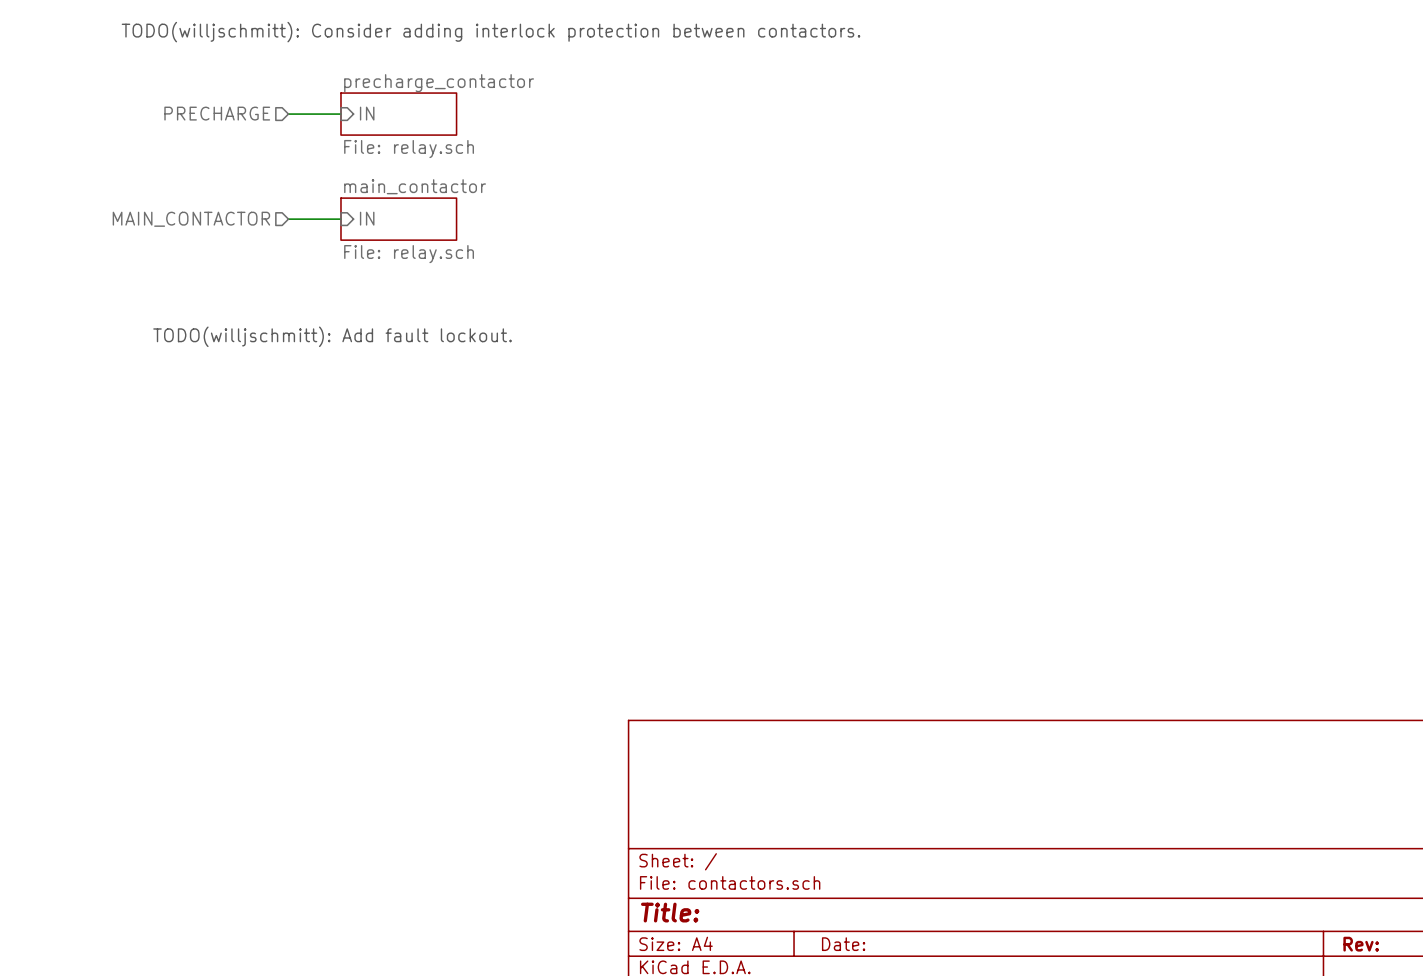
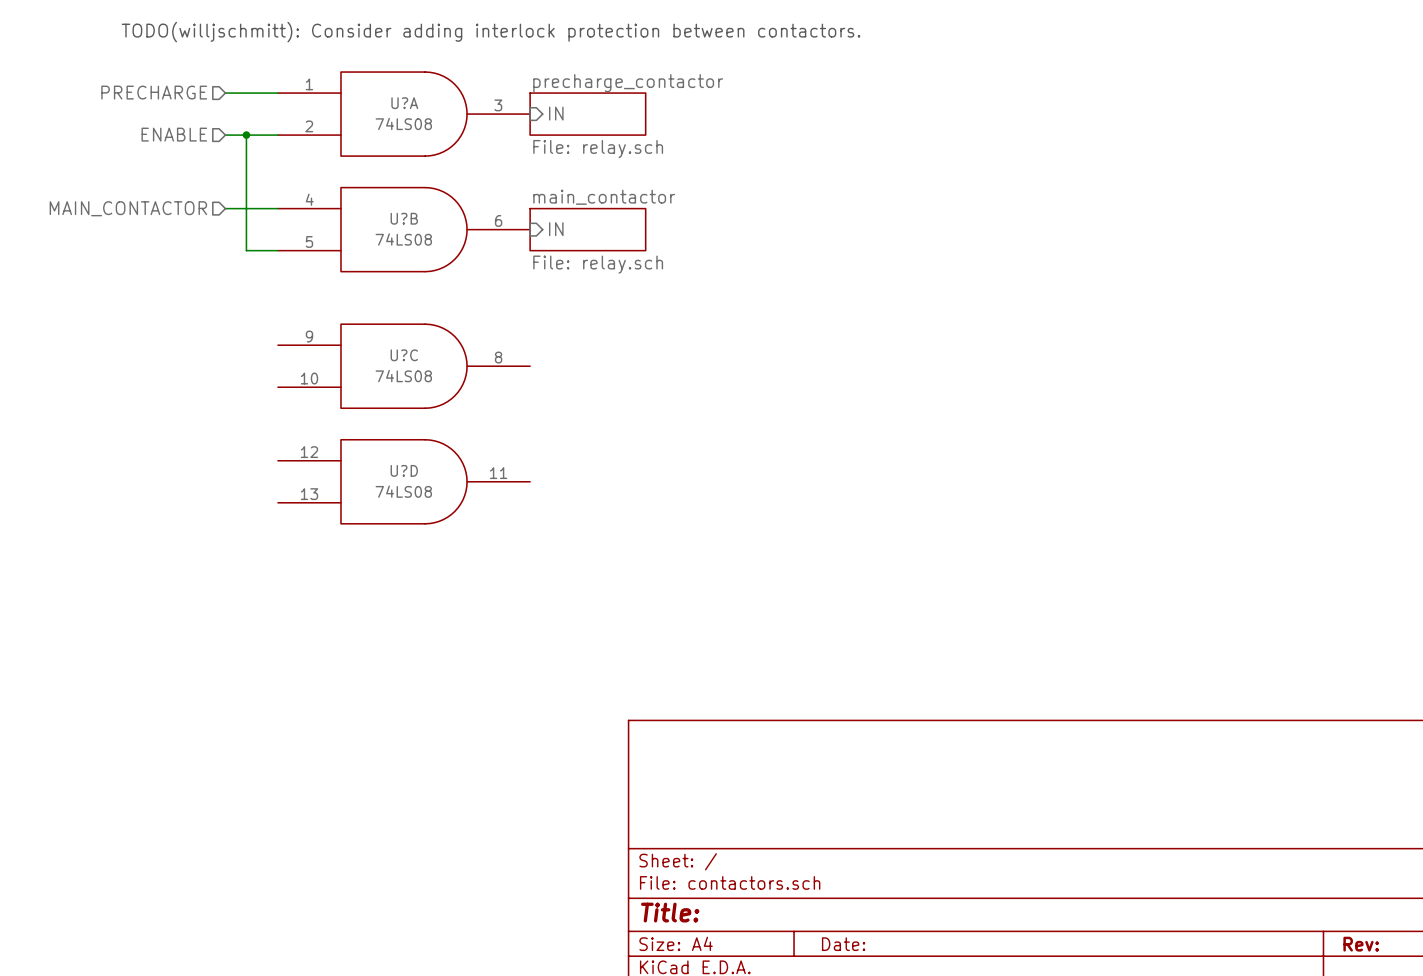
hierarchical label position: PRECHARGE (217, 113) -> PRECHARGE (154, 92)
sheet pin: IN (367, 113) -> none
sheet pin: none -> IN (556, 113)
wire: (288, 114) (340, 114) -> (225, 93) (277, 93)
sheet precharge_contactor position: (398, 114) -> (587, 114)
U?A: none -> 74LS08 (404, 114)
hierarchical label: none -> ENABLE (174, 134)
wire: none -> (225, 135) (277, 135)
wire: none -> (246, 135) (246, 250) (277, 250)
junction: none -> (246, 135)
sheet pin: IN (367, 218) -> none
hierarchical label position: MAIN_CONTACTOR (191, 219) -> MAIN_CONTACTOR (128, 208)
wire: (288, 219) (340, 219) -> (225, 208) (277, 208)
sheet main_contactor position: (398, 219) -> (587, 229)
U?B: none -> 74LS08 (404, 229)
sheet pin: none -> IN (556, 229)
text: TODO(willjschmitt): Add fault lockout. (332, 336) -> none
U?C: none -> 74LS08 (404, 366)
U?D: none -> 74LS08 (404, 481)

